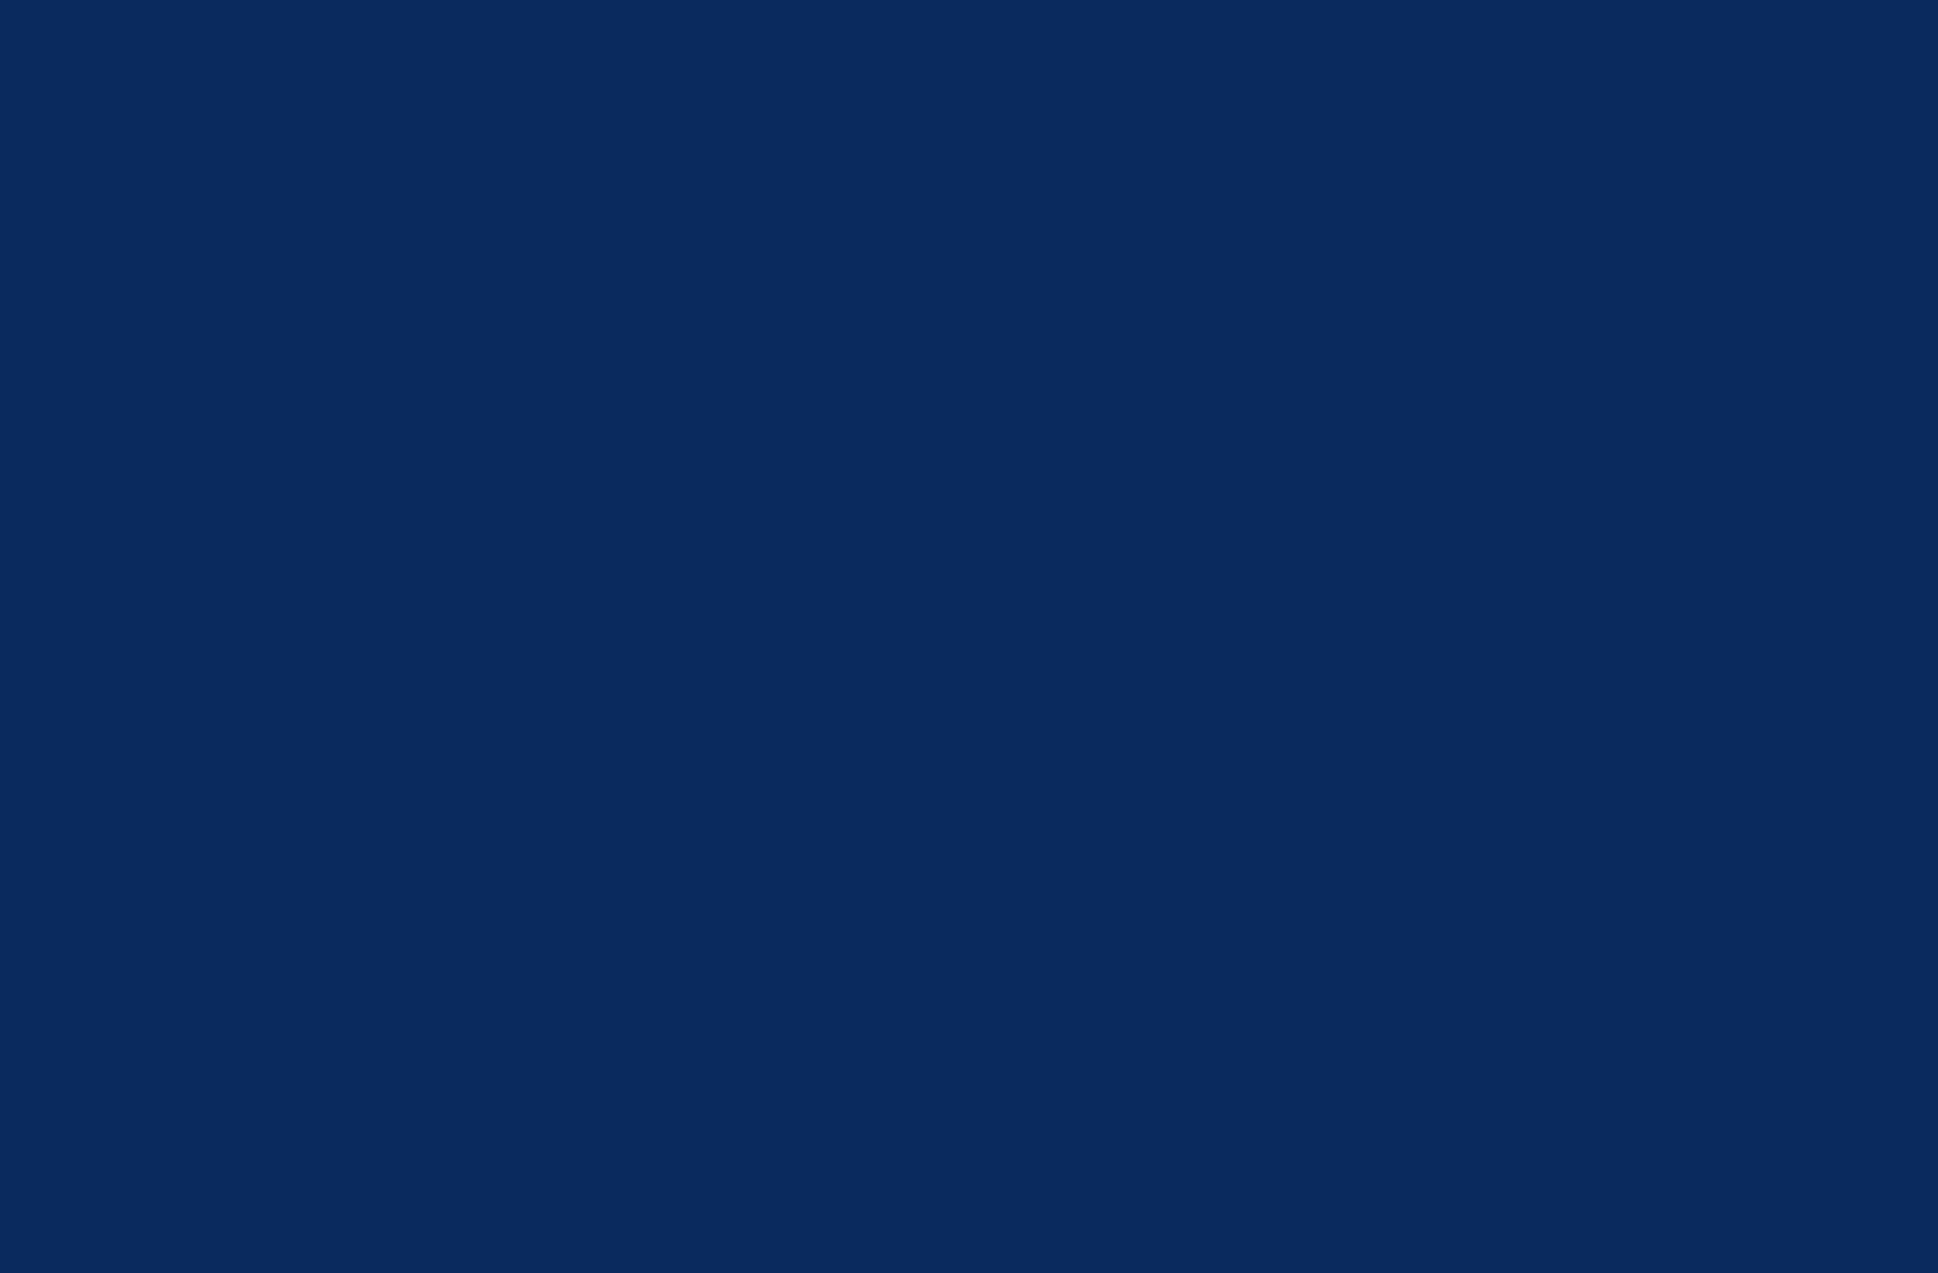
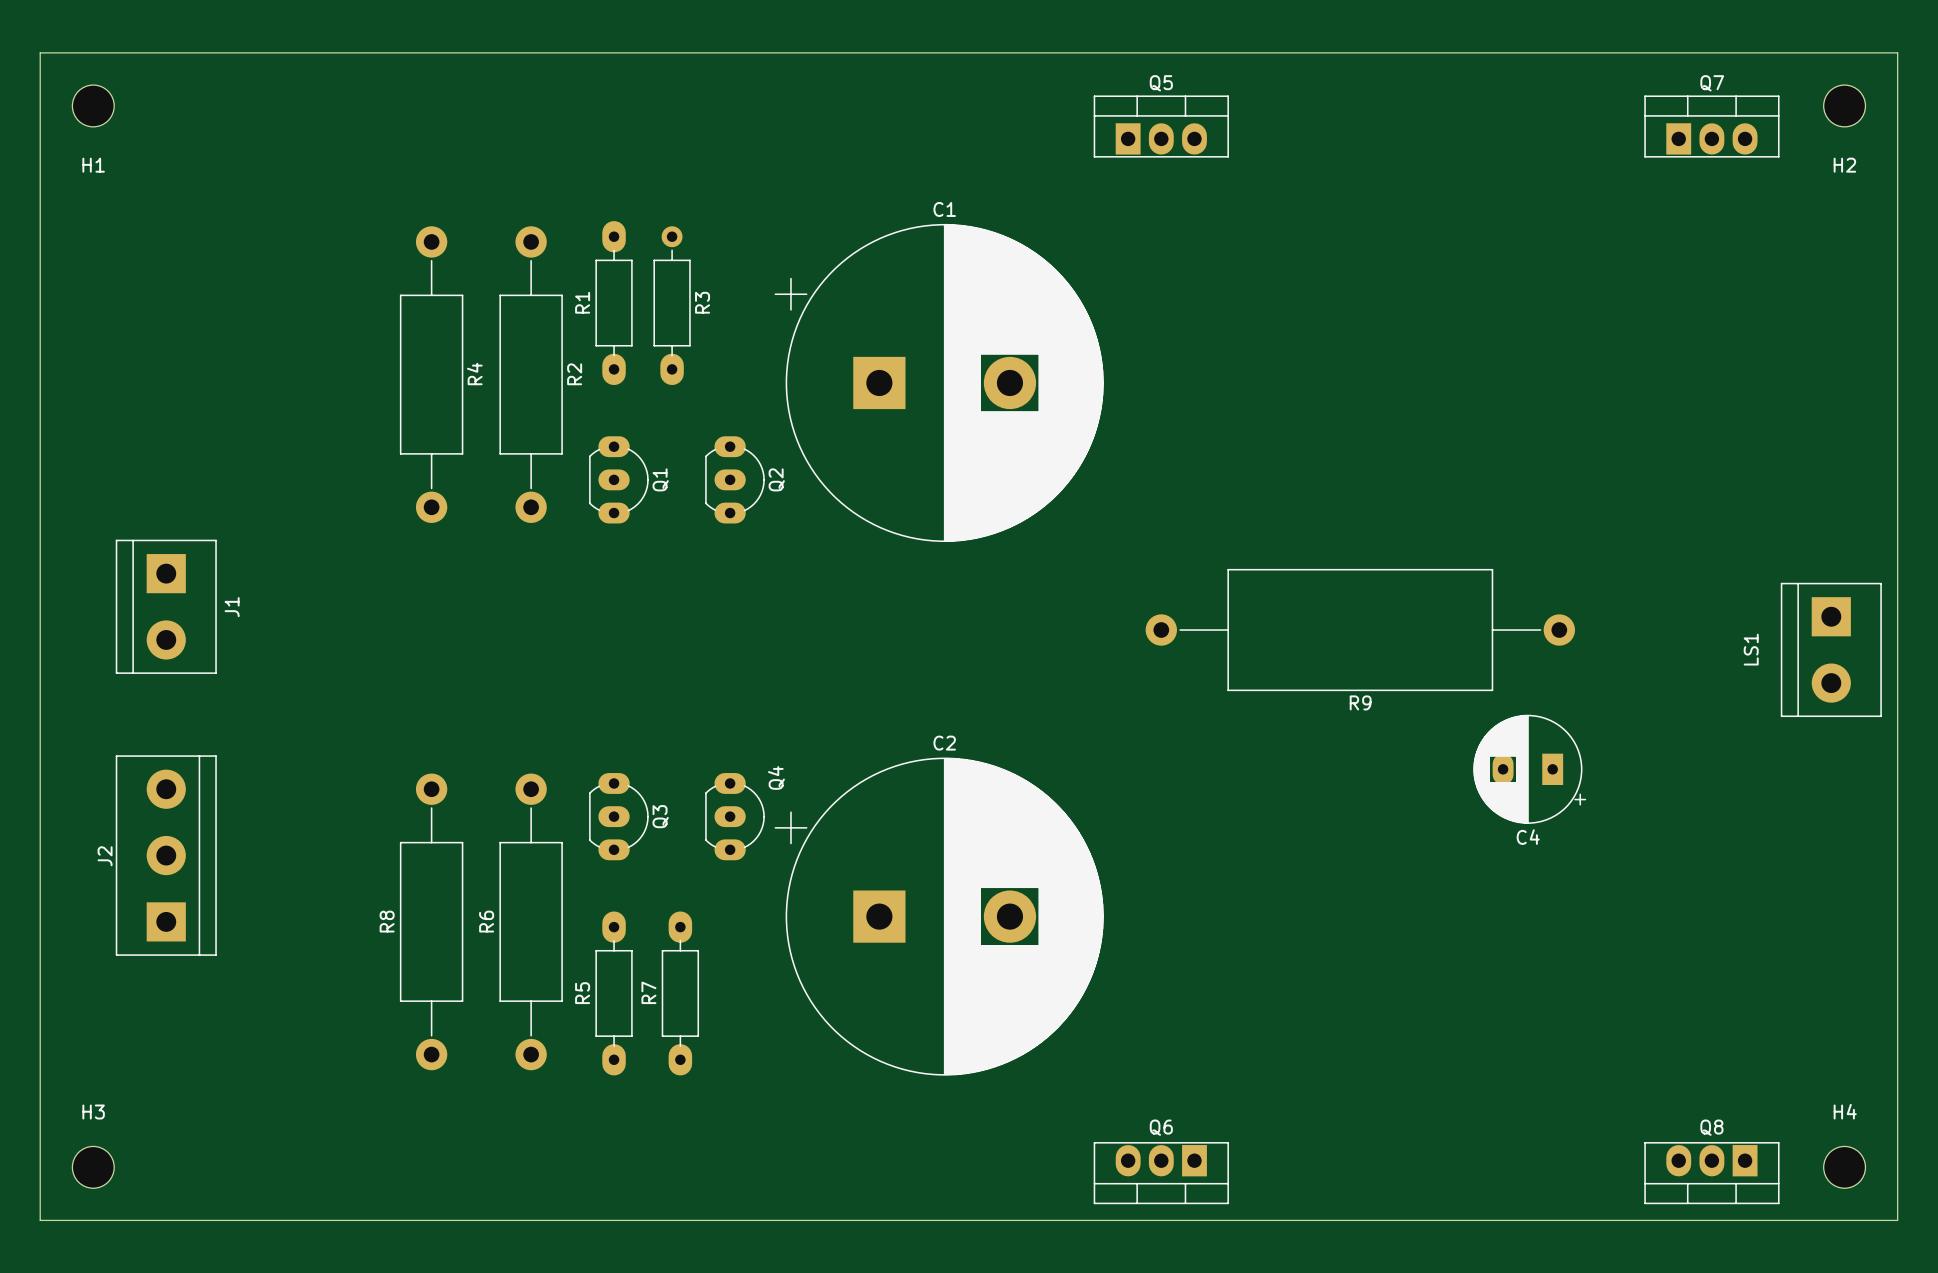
board edge: none -> (40, 52) (1897, 52) (1897, 1220) (40, 1220) (40, 52)
H1: none -> (93, 105)
H2: none -> (1844, 105)
Q5: none -> (1161, 126)
Q7: none -> (1711, 126)
R1: none -> (614, 303)
R3: none -> (672, 305)
R4: none -> (431, 374)
R2: none -> (531, 374)
C1: none -> (939, 382)
Q1: none -> (618, 479)
Q2: none -> (735, 479)
J1: none -> (166, 606)
R9: none -> (1360, 630)
LS1: none -> (1831, 649)
C4: none -> (1529, 769)
Q3: none -> (618, 816)
Q4: none -> (735, 816)
J2: none -> (166, 855)
C2: none -> (939, 916)
R8: none -> (431, 921)
R6: none -> (531, 921)
R5: none -> (614, 993)
R7: none -> (680, 993)
H3: none -> (93, 1167)
H4: none -> (1844, 1167)
Q6: none -> (1161, 1173)
Q8: none -> (1711, 1173)

